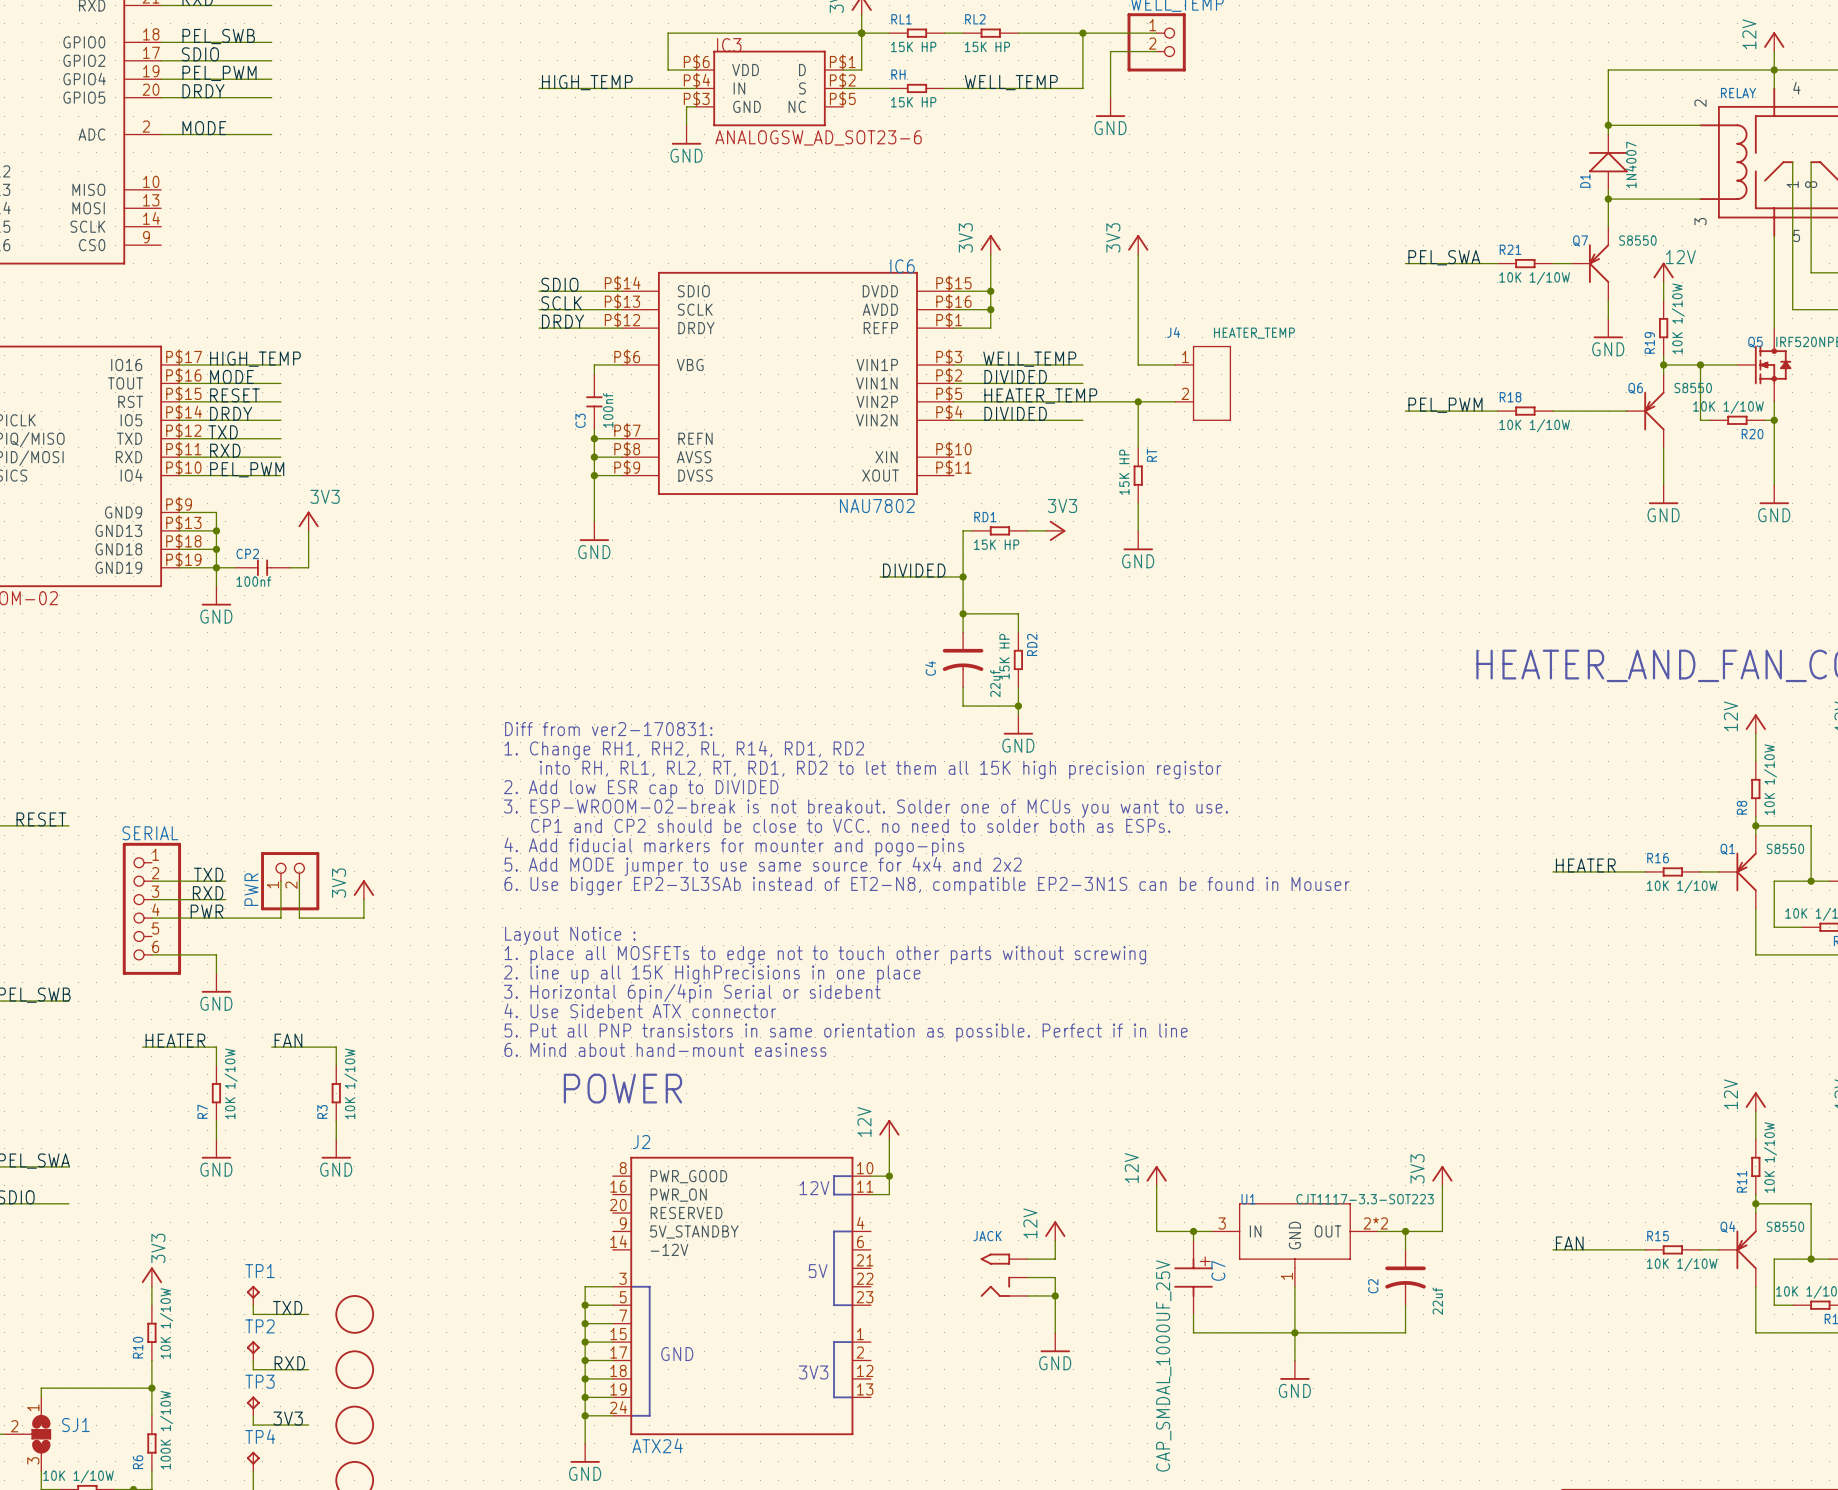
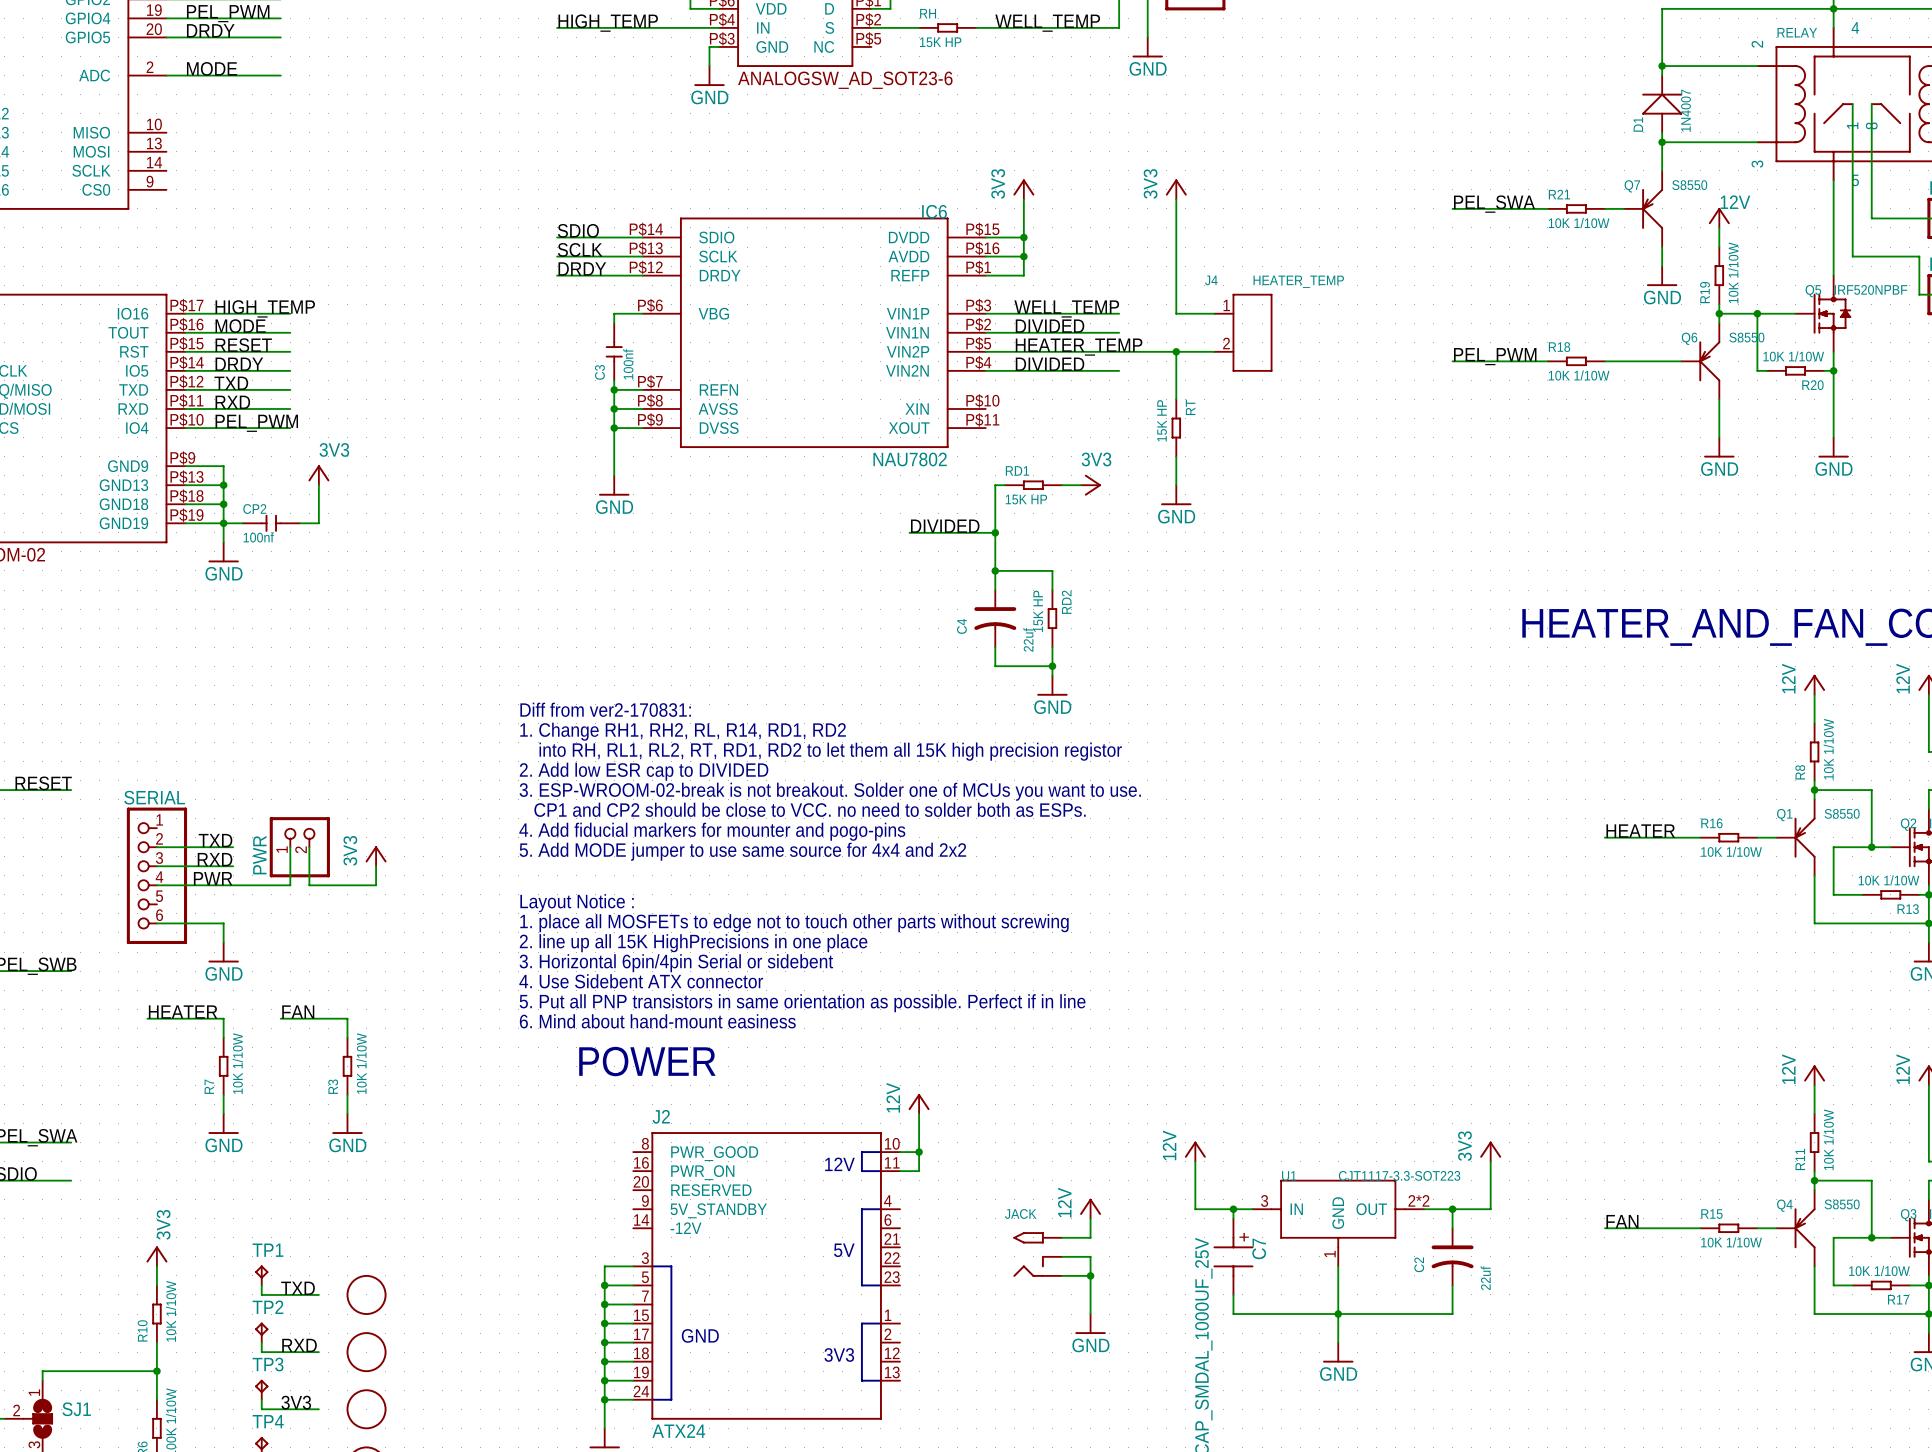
text: Diff from ver2-170831: (608, 729) -> none
text: 1. Change RH1, RH2, RL, R14, RD1, RD2 (684, 750) -> Diff from ver2-170831: (605, 709)
text: into RH, RL1, RL2, RT, RD1, RD2 to let them all 15K high precision registor (880, 769) -> 1. Change RH1, RH2, RL, R14, RD1, RD2 (683, 731)
text: 2. Add low ESR cap to DIVIDED (641, 789) -> into RH, RL1, RL2, RT, RD1, RD2 to let them all 15K high precision registor (830, 751)
text: 3. ESP-WROOM-02-break is not breakout. Solder one of MCUs you want to use. (865, 808) -> 2. Add low ESR cap to DIVIDED (644, 771)
text: CP1 and CP2 should be close to VCC. no need to solder both as ESPs. (850, 825) -> 3. ESP-WROOM-02-break is not breakout. Solder one of MCUs you want to use. (830, 791)
text: 4. Add fiducial markers for mounter and pogo-pins (734, 847) -> CP1 and CP2 should be close to VCC. no need to solder both as ESPs. (810, 809)
text: 5. Add MODE jumper to use same source for 4x4 and 2x2 (763, 866) -> 4. Add fiducial markers for mounter and pogo-pins (712, 831)
text: 6. Use bigger EP2-3L3SAb instead of ET2-N8, compatible EP2-3N1S can be found in Mouser (927, 886) -> 5. Add MODE jumper to use same source for 4x4 and 2x2 (742, 851)

